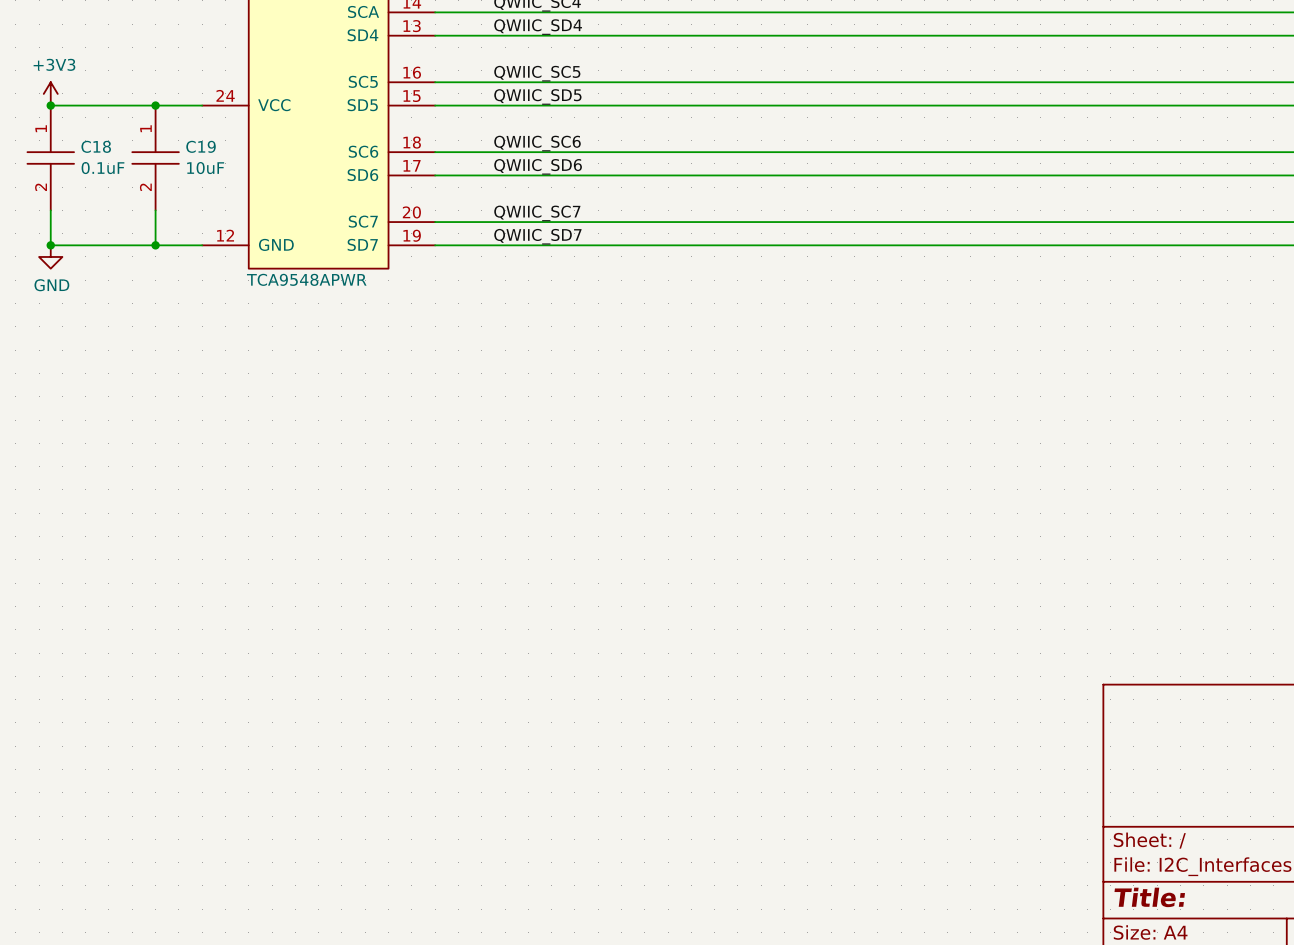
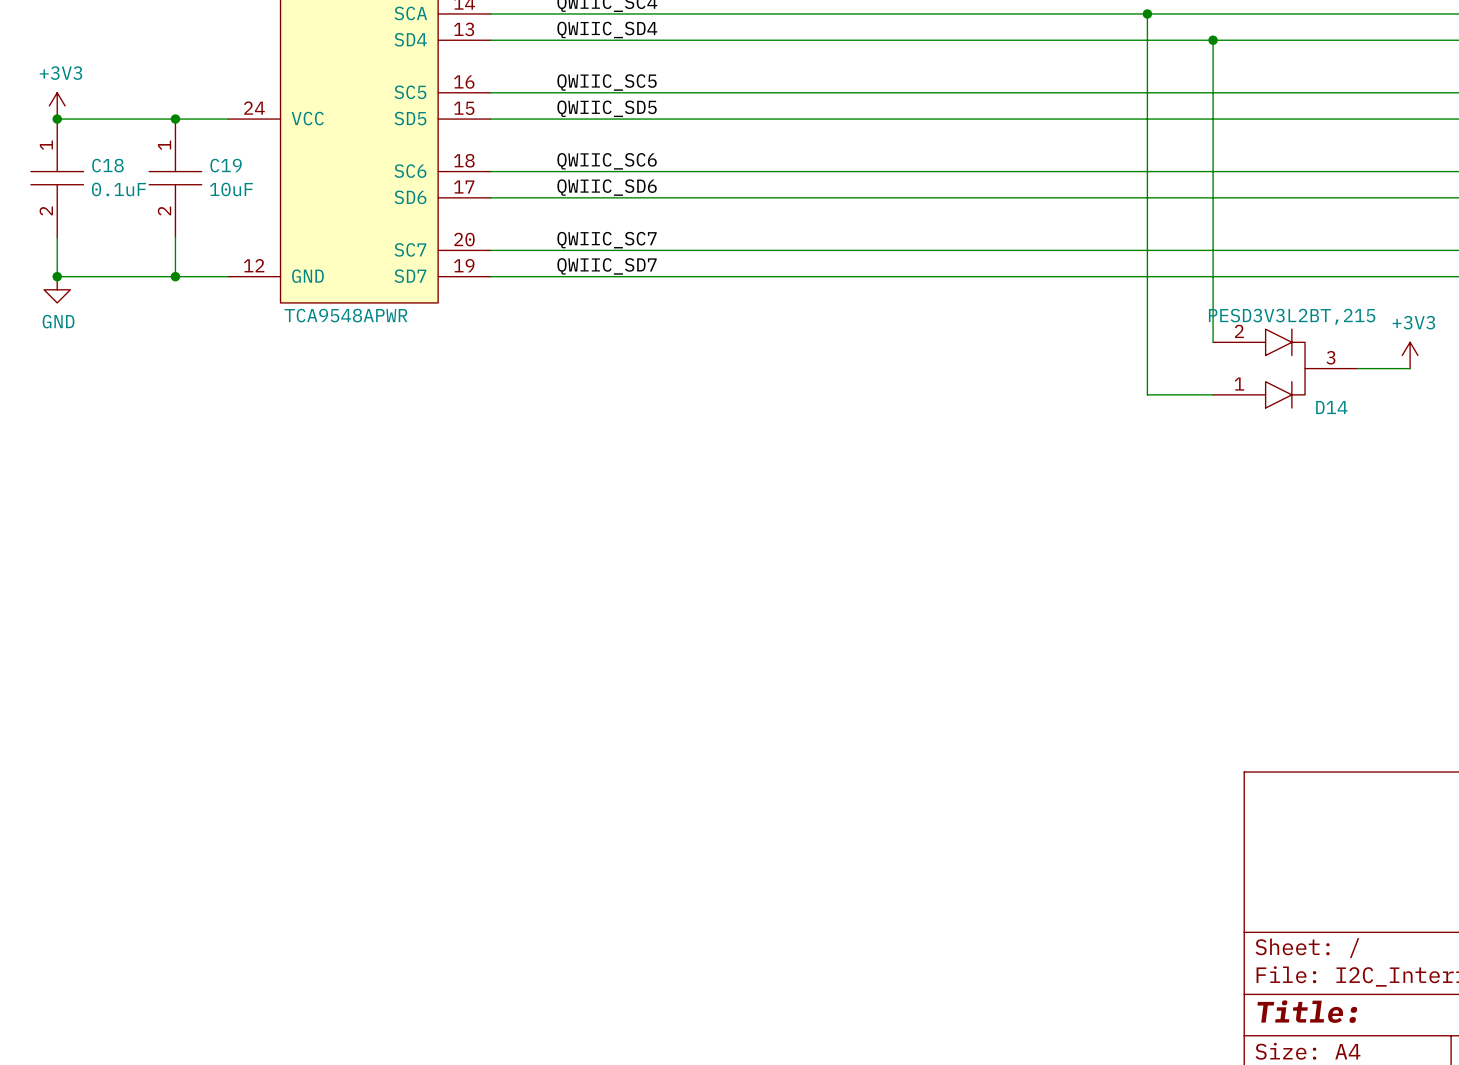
wire: none -> (1147, 13) (1147, 394) (1213, 394)
junction: none -> (1147, 13)
wire: none -> (1213, 40) (1213, 342)
junction: none -> (1213, 40)
power symbol: none -> +3V3 (1410, 355)
D14: none -> (1285, 368)
wire: none -> (1357, 368) (1410, 368)

